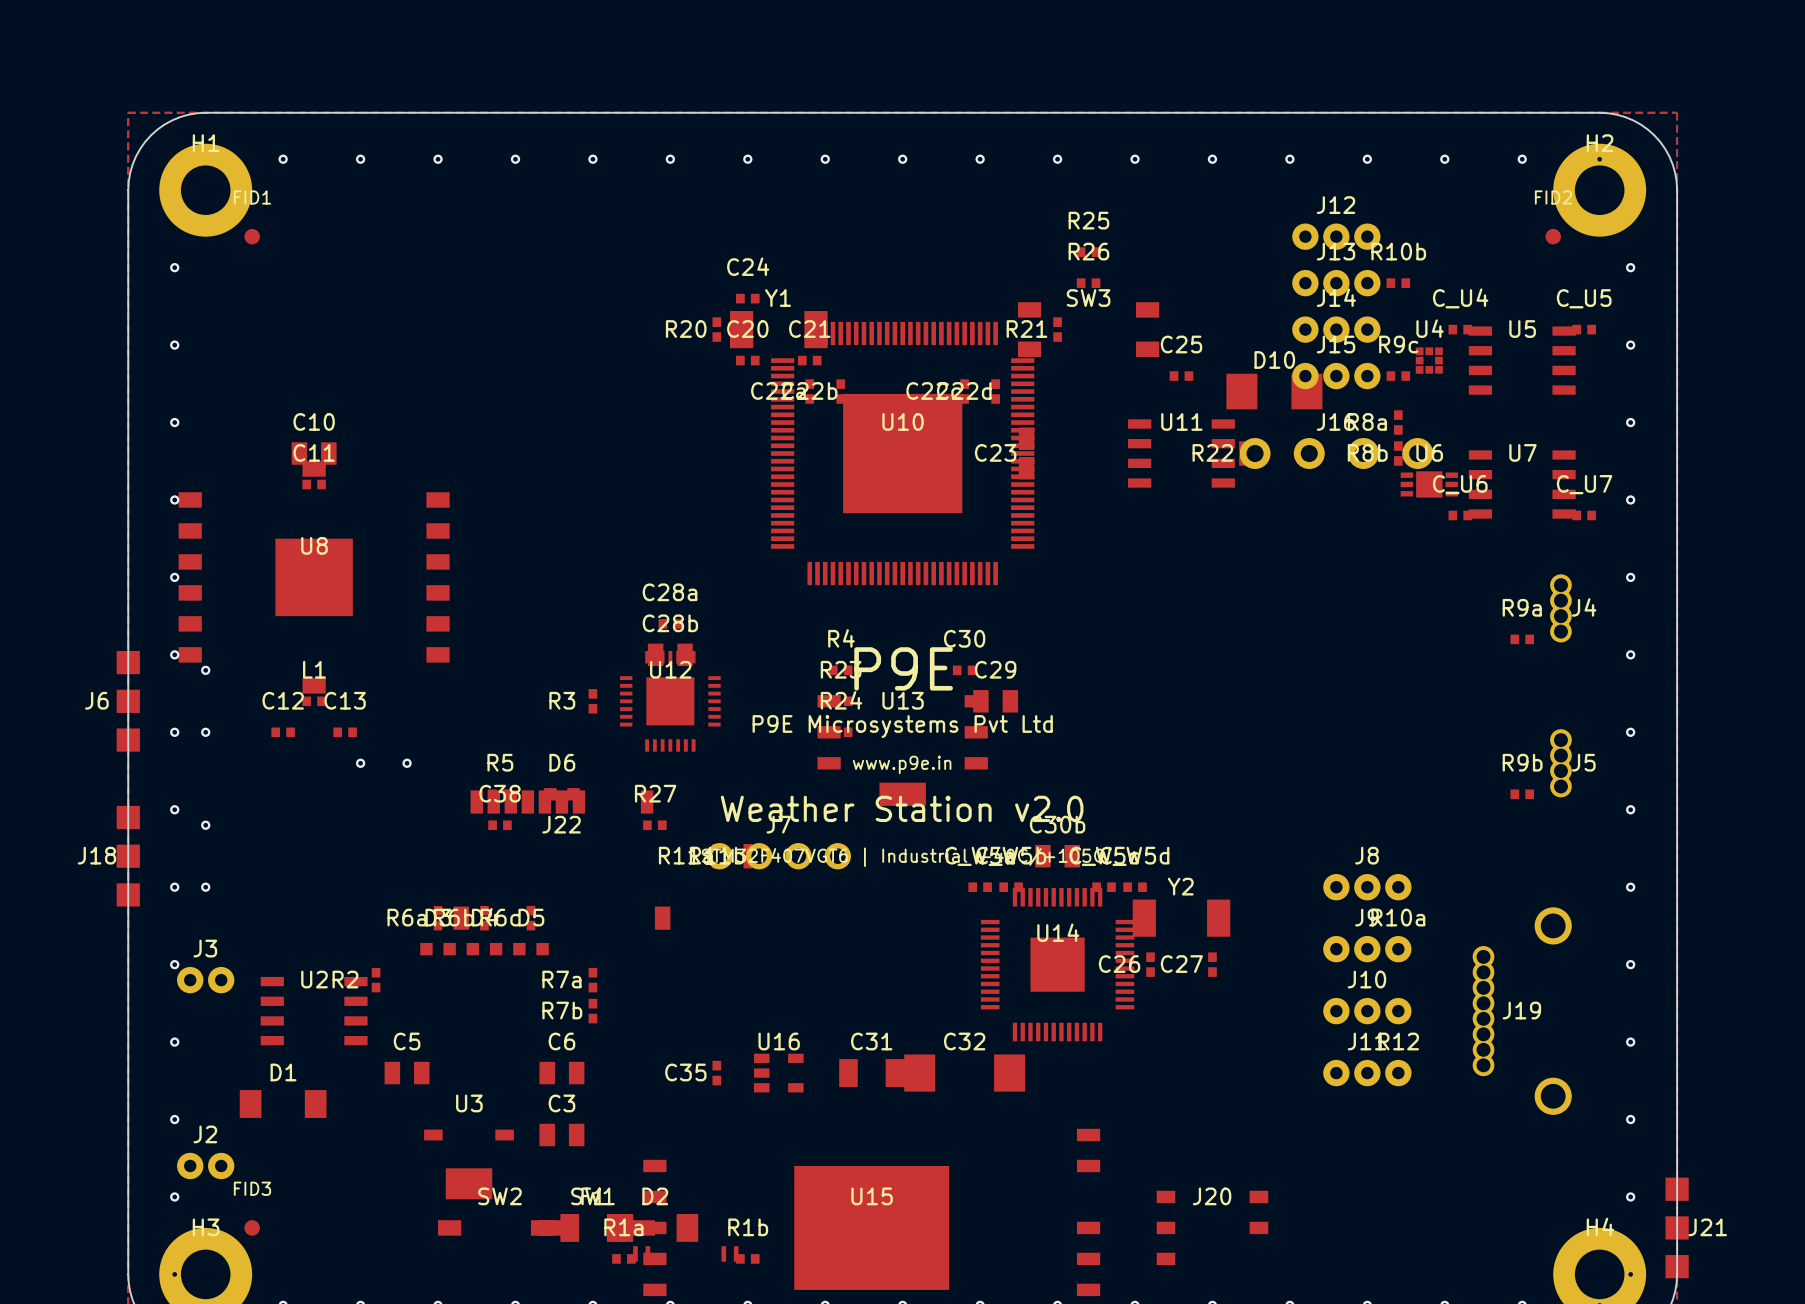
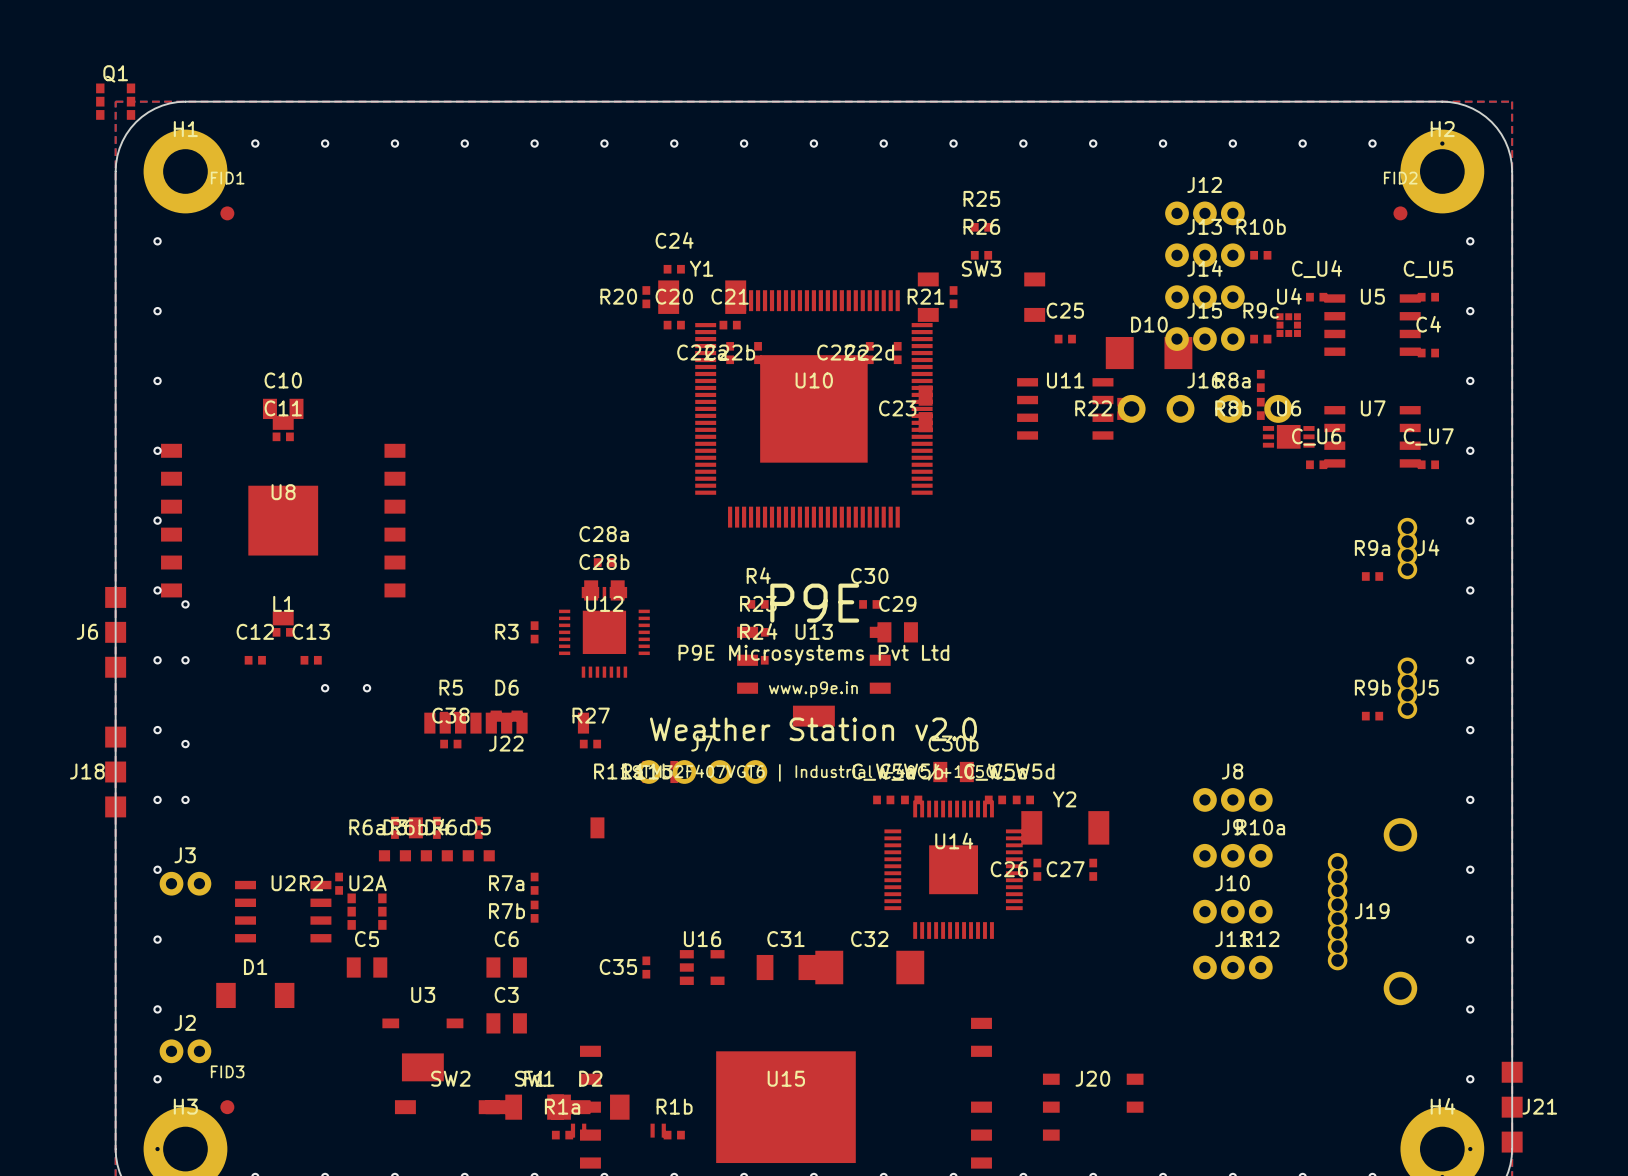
Q1: none -> (115, 101)
C4: none -> (1428, 353)
U2A: none -> (367, 911)

